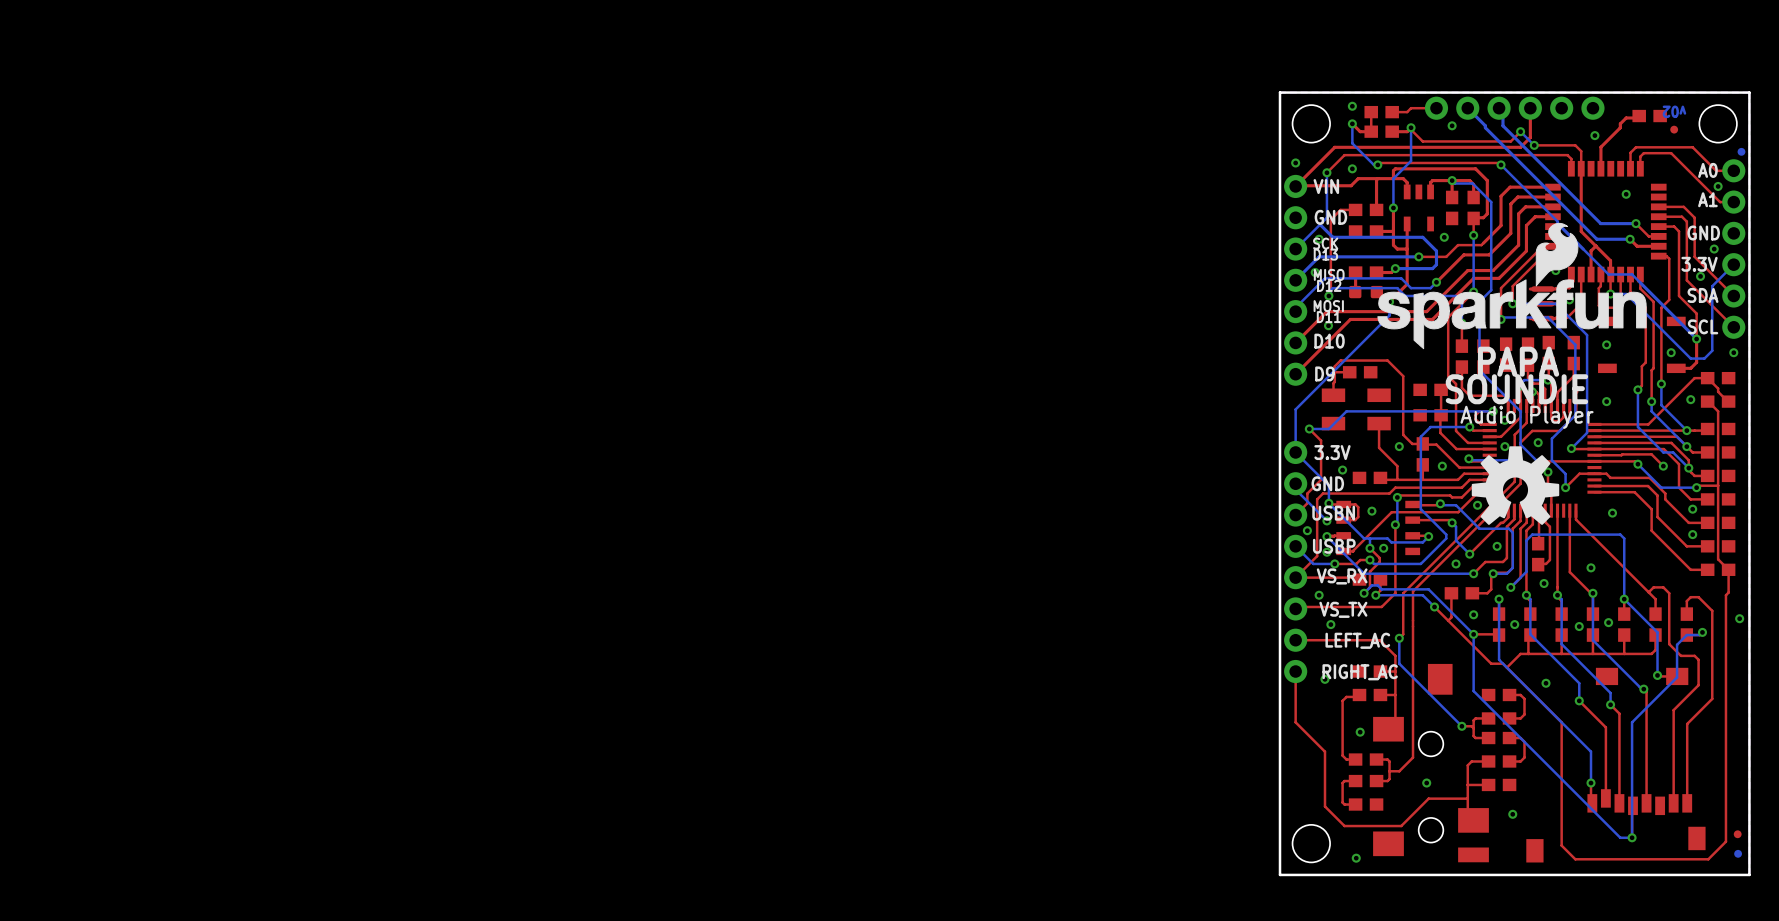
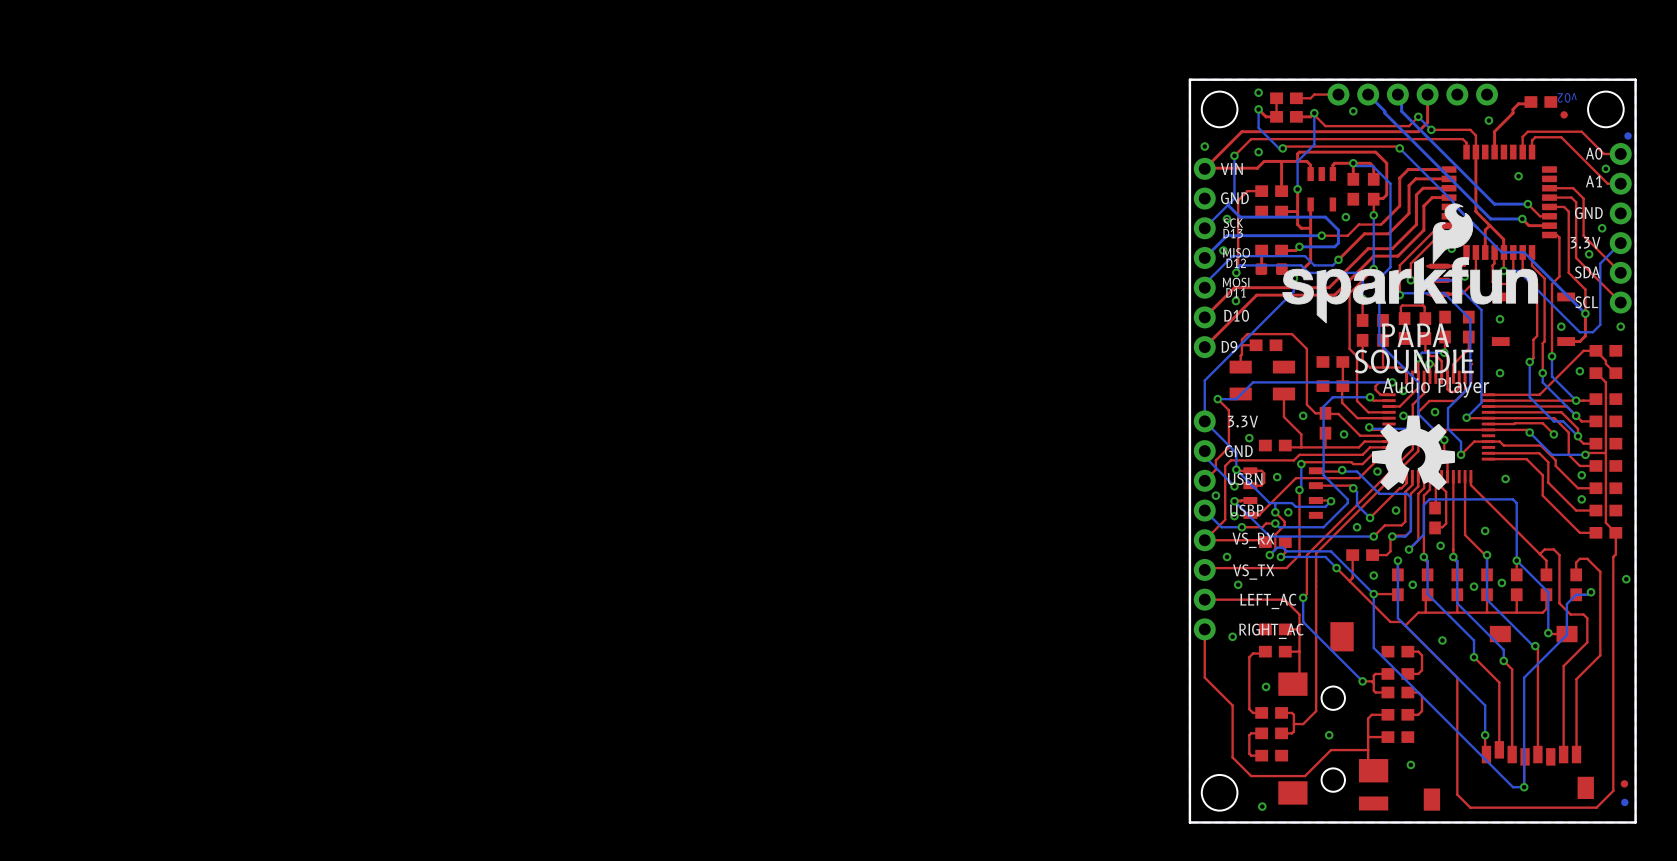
top track: none -> (1424, 316) (1423, 305) (1402, 305) (1402, 316)

